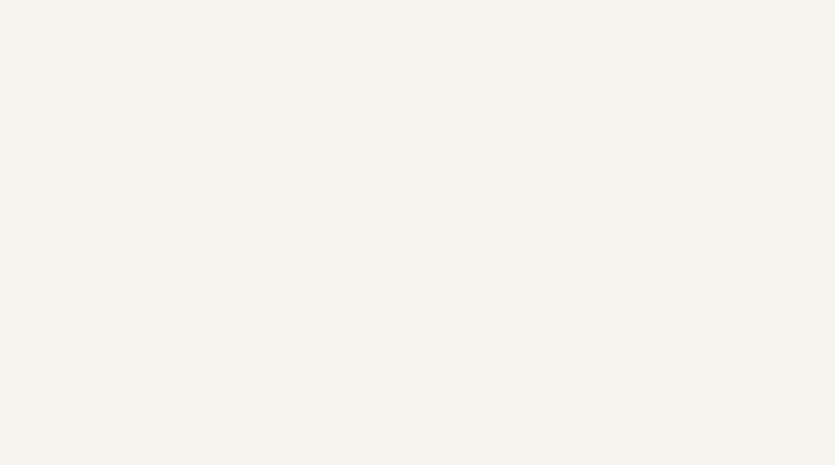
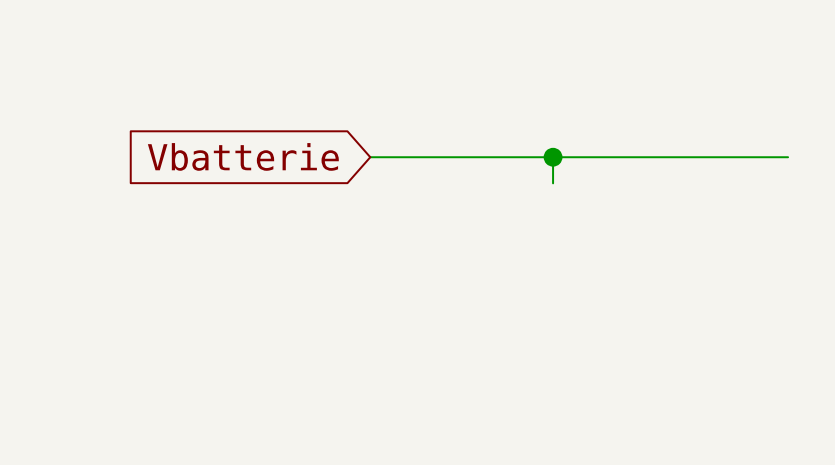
global label: none -> Vbatterie (243, 156)
wire: none -> (370, 157) (788, 157)
wire: none -> (553, 157) (553, 183)
junction: none -> (553, 157)

